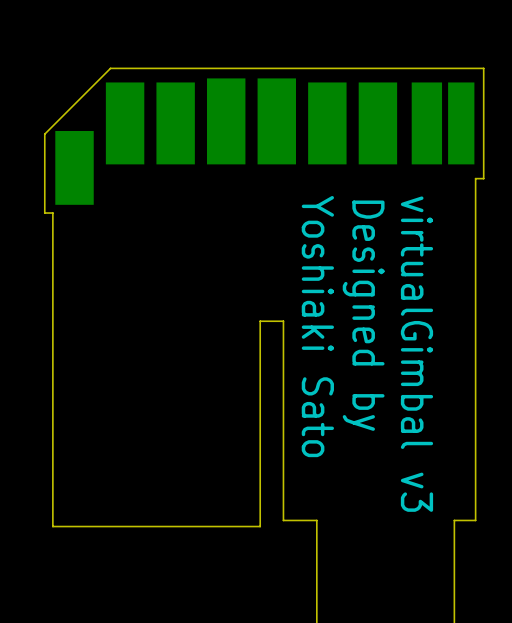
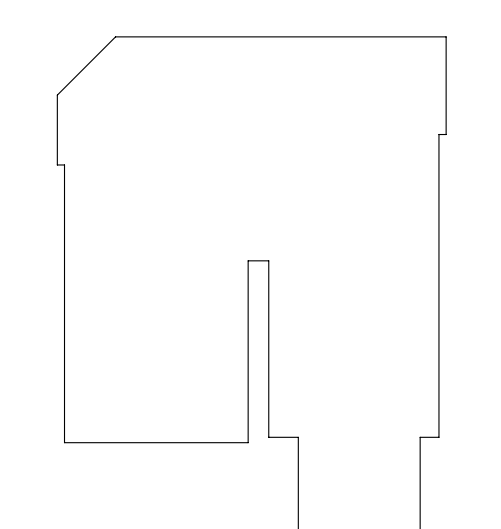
part: (264, 141) -> none
text: Designed by (363, 315) -> none
text: Yoshiaki Sato (317, 326) -> none
text: virtualGimbal v3 (416, 354) -> none

